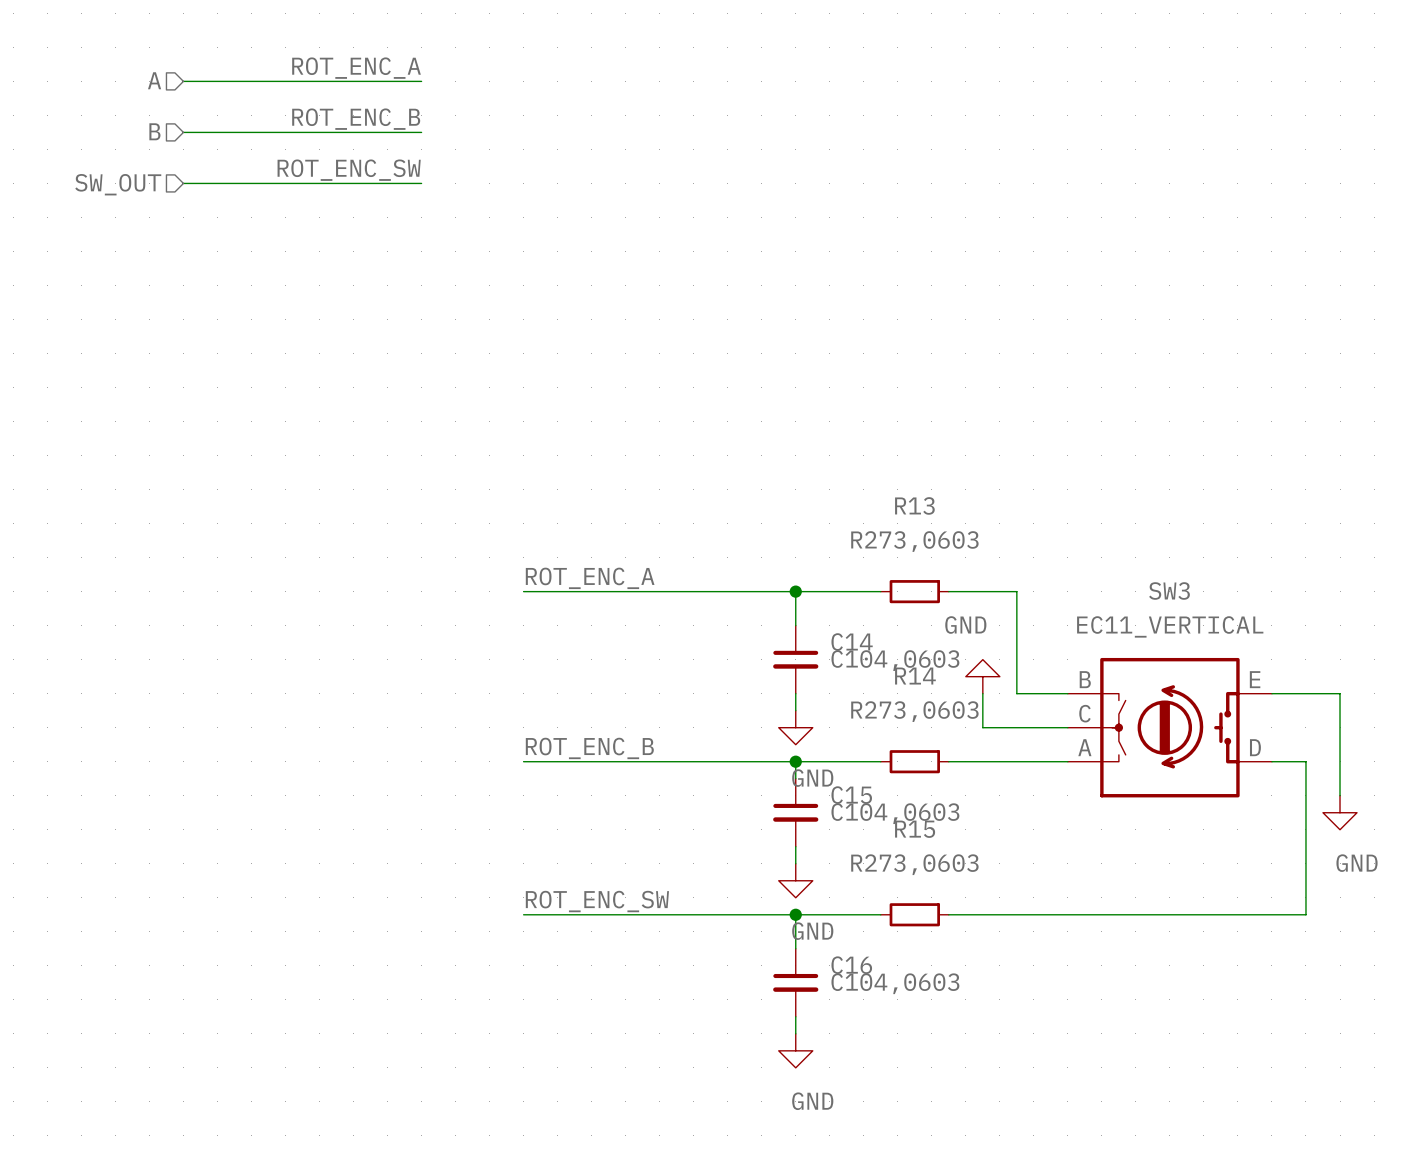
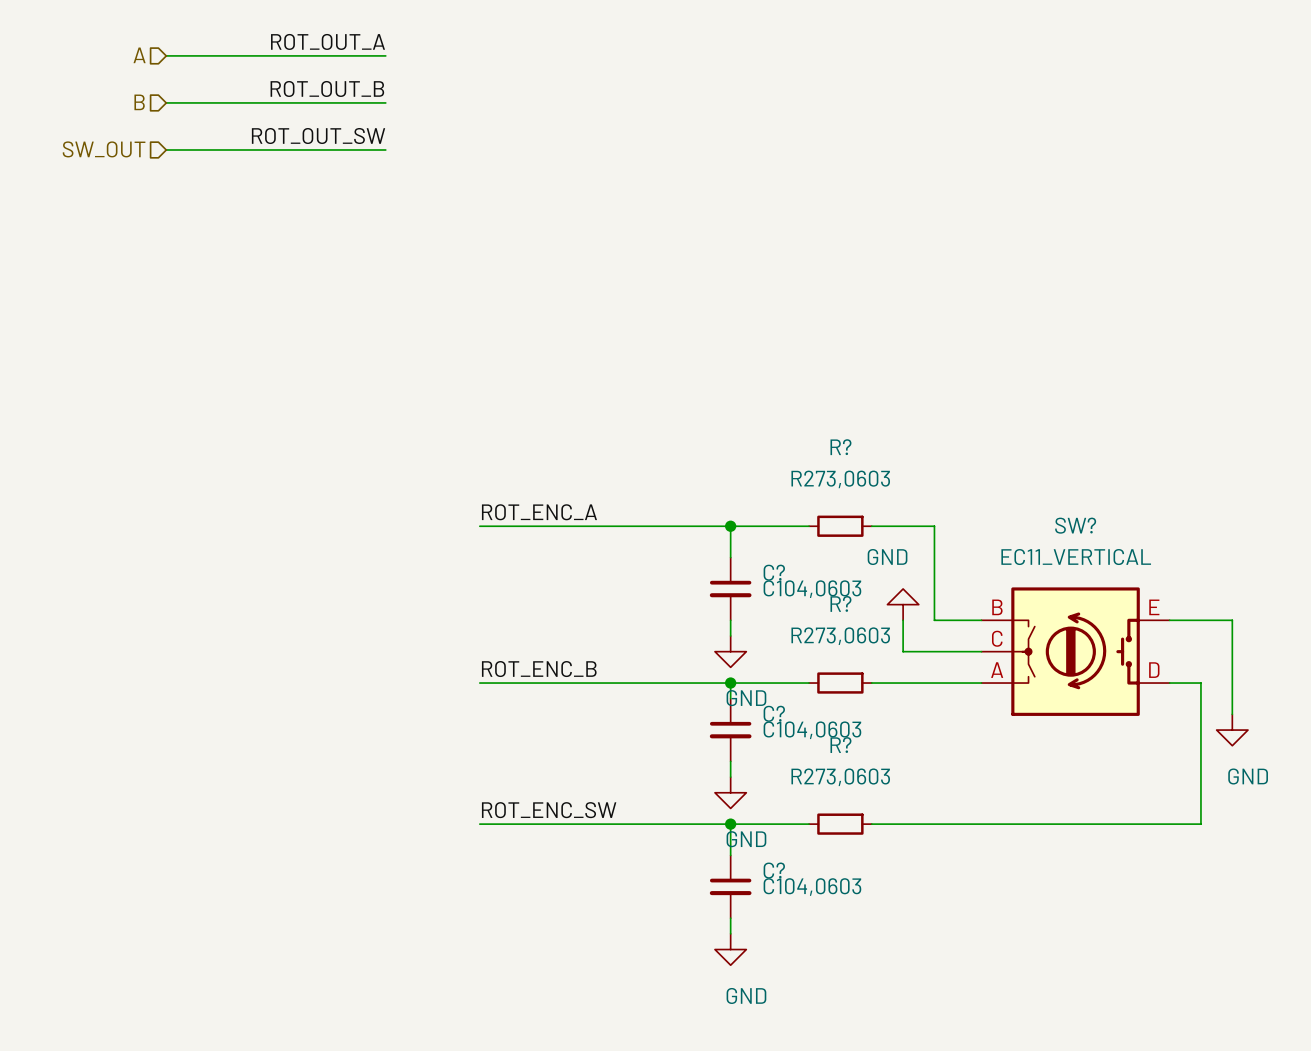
label: ROT_ENC_A (356, 68) -> ROT_OUT_A (328, 41)
label: ROT_ENC_B (356, 119) -> ROT_OUT_B (327, 88)
label: ROT_ENC_SW (349, 170) -> ROT_OUT_SW (318, 136)
R13 name: R13 (914, 505) -> R? (840, 447)
SW3 name: SW3 (1169, 590) -> SW? (1075, 525)
C14 name: C14 (852, 642) -> C? (774, 572)
R14 name: R14 (915, 676) -> R? (840, 603)
C15 name: C15 (851, 795) -> C? (774, 713)
R15 name: R15 (915, 829) -> R? (840, 745)
C16 name: C16 (851, 965) -> C? (774, 870)

